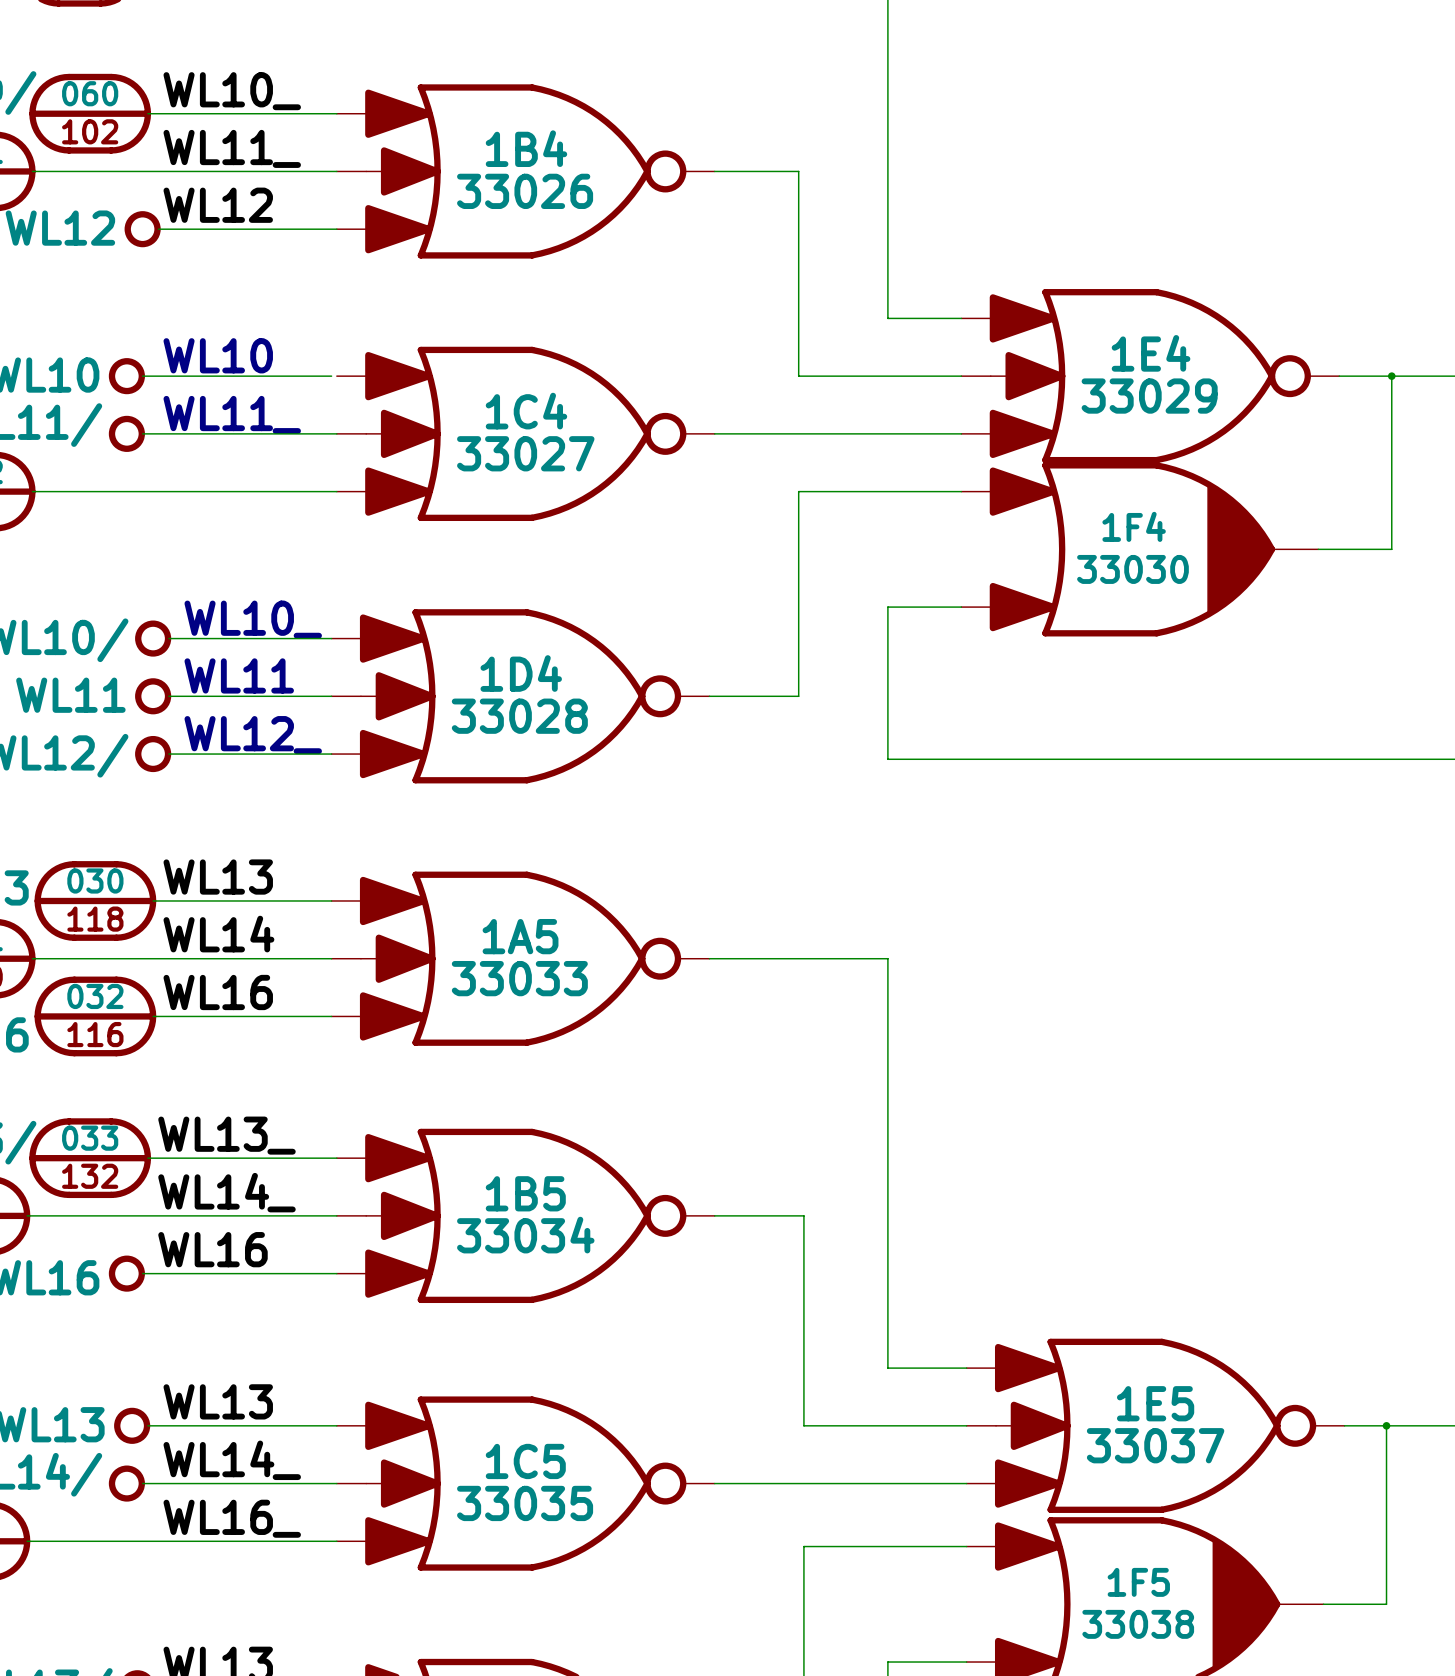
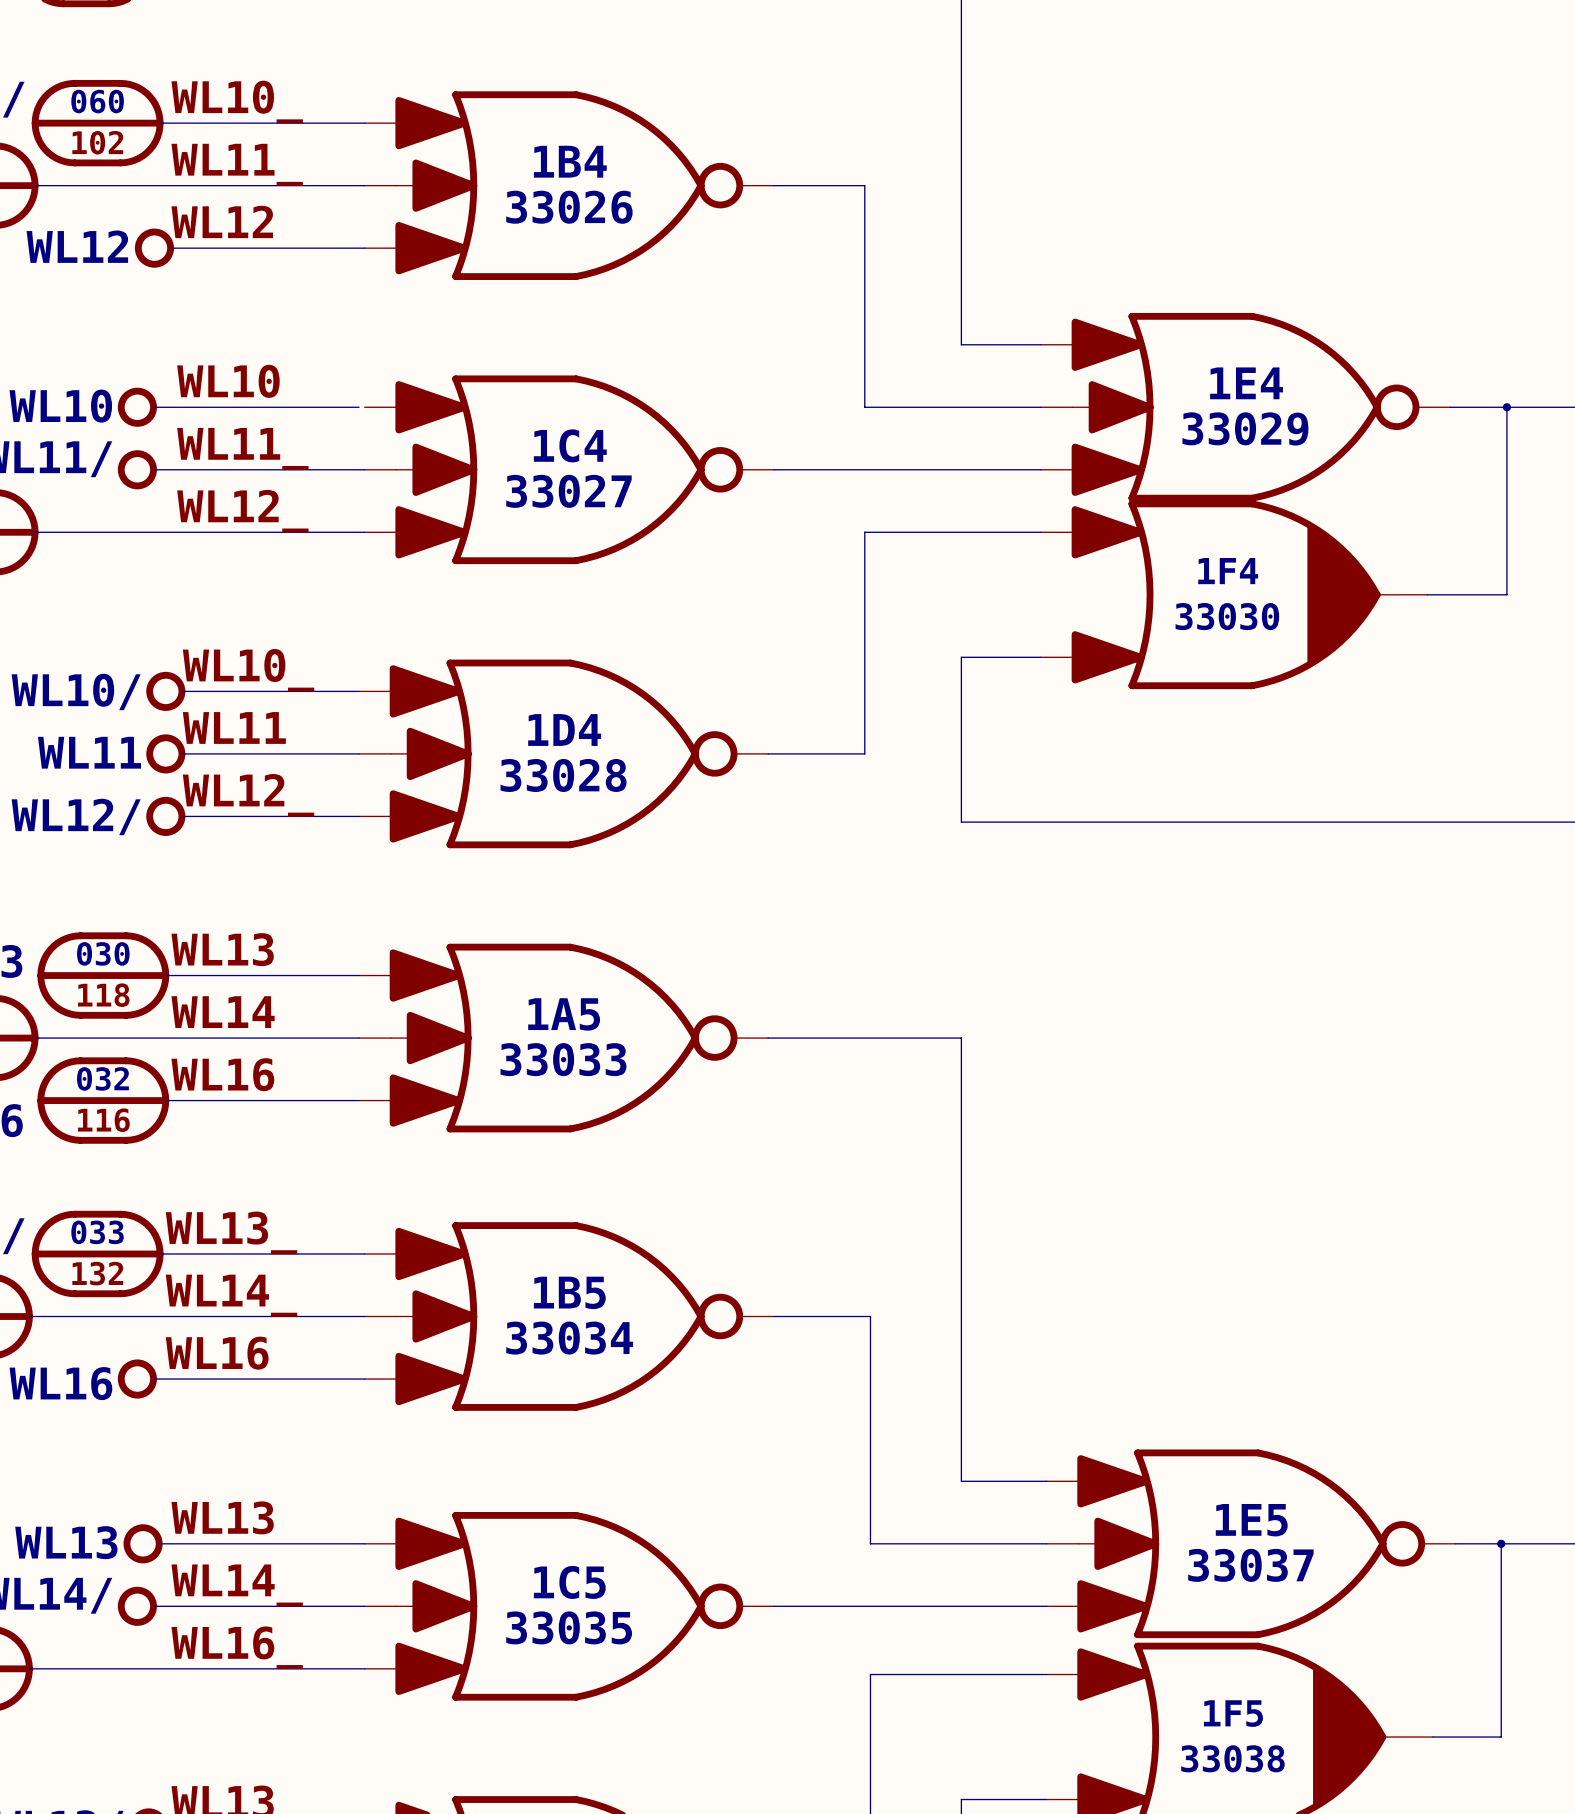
label: none -> WL10 (228, 381)
text: WL10 (218, 355) -> none
label: none -> WL11_ (242, 448)
text: WL11_ (232, 414) -> none
label: none -> WL12_ (242, 511)
label: none -> WL10_ (248, 670)
text: WL10_ (253, 619) -> none
label: none -> WL11 (234, 727)
text: WL11 (239, 675) -> none
label: none -> WL12_ (248, 795)
text: WL12_ (253, 735) -> none

